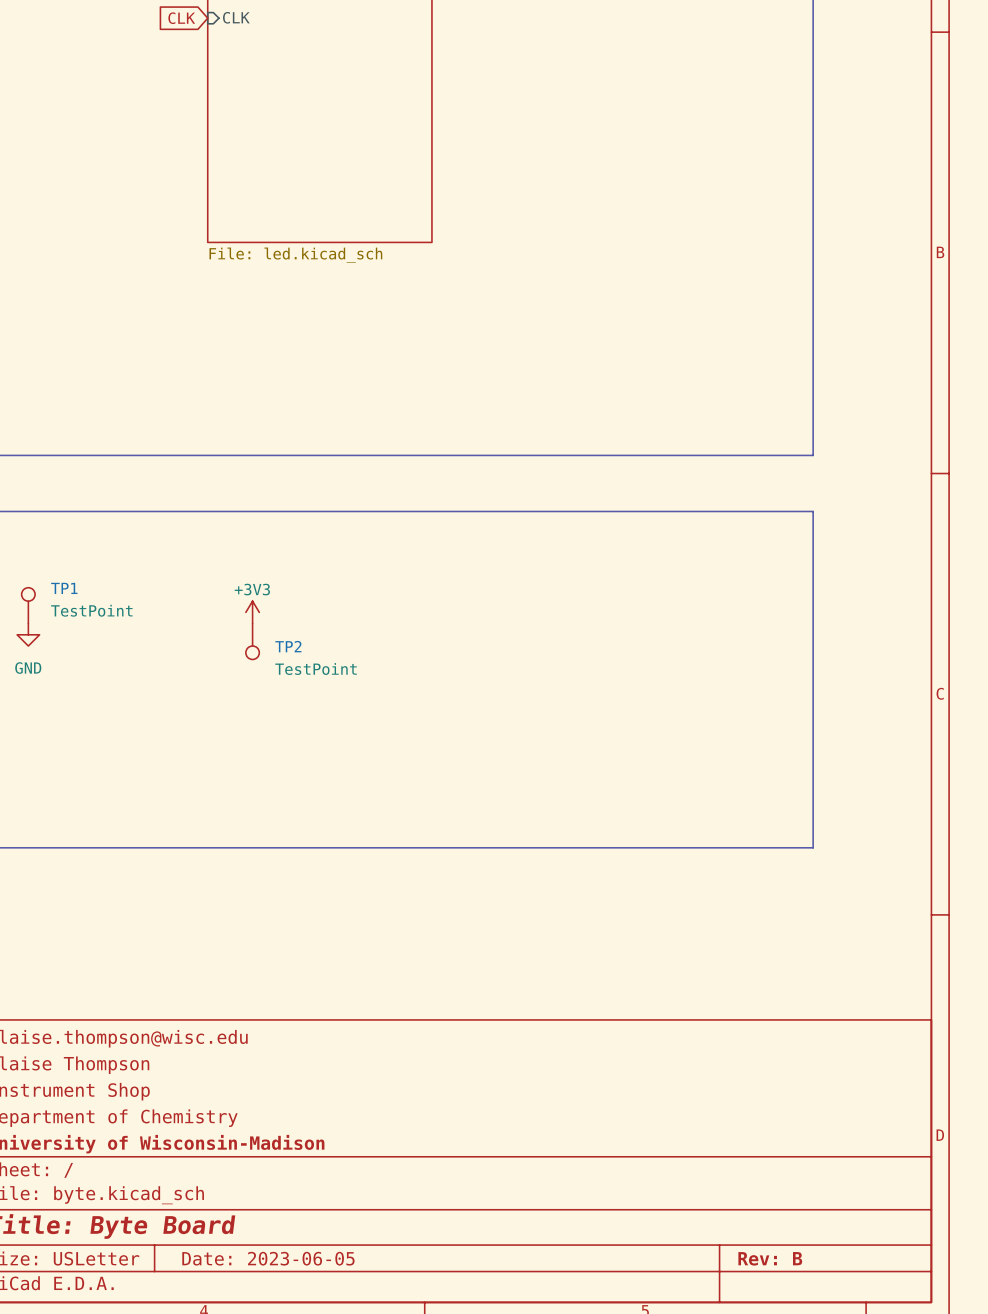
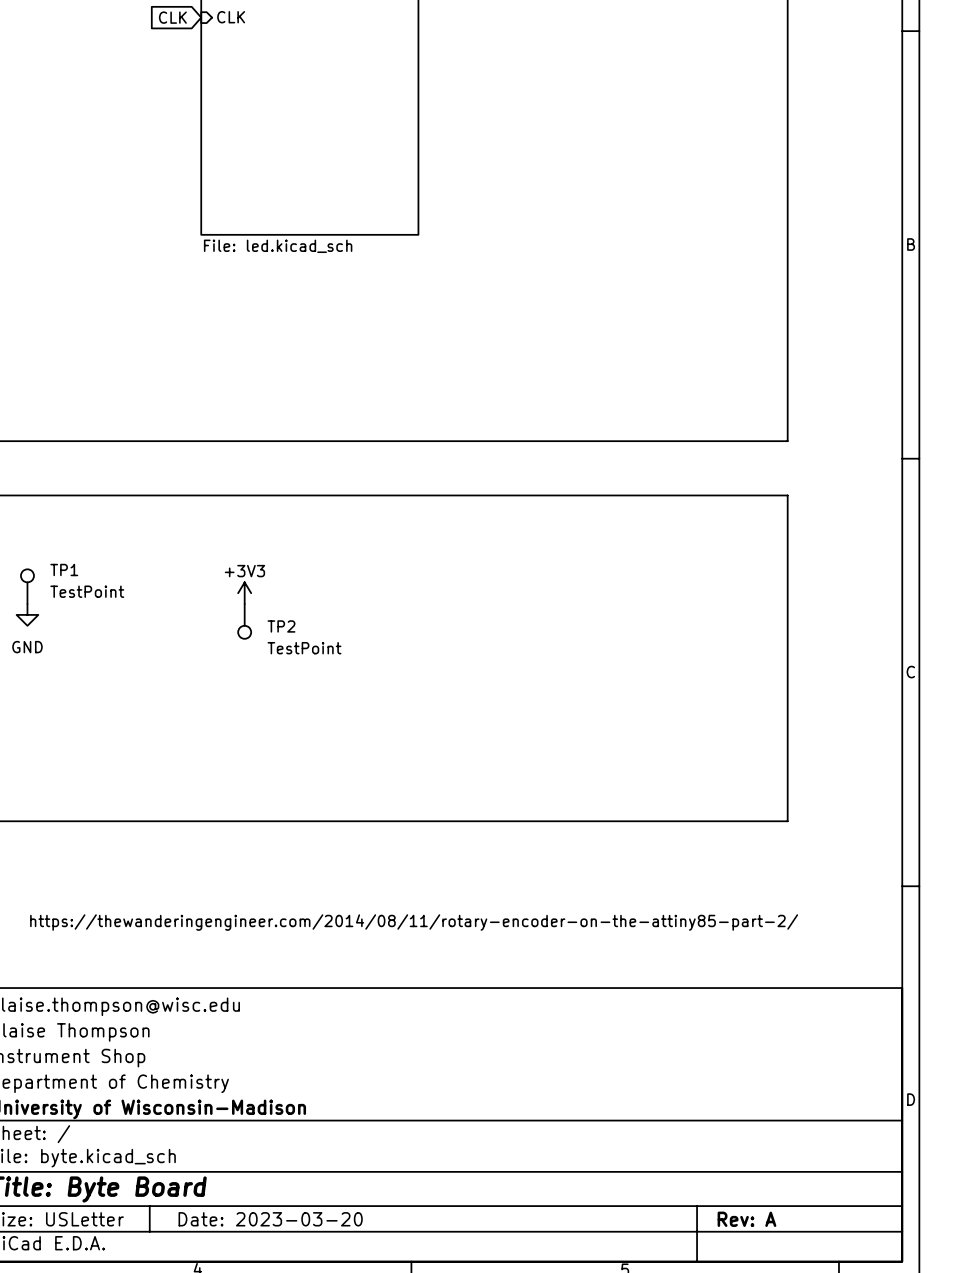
text: none -> https://thewanderingengineer.com/2014/08/11/rotary-encoder-on-the-attiny85-part-2/ (414, 922)
title block: Date: 2023-06-05 (268, 1258) -> Date: 2023-03-20 (270, 1219)
title block: Rev: B (770, 1258) -> Rev: A (746, 1219)

